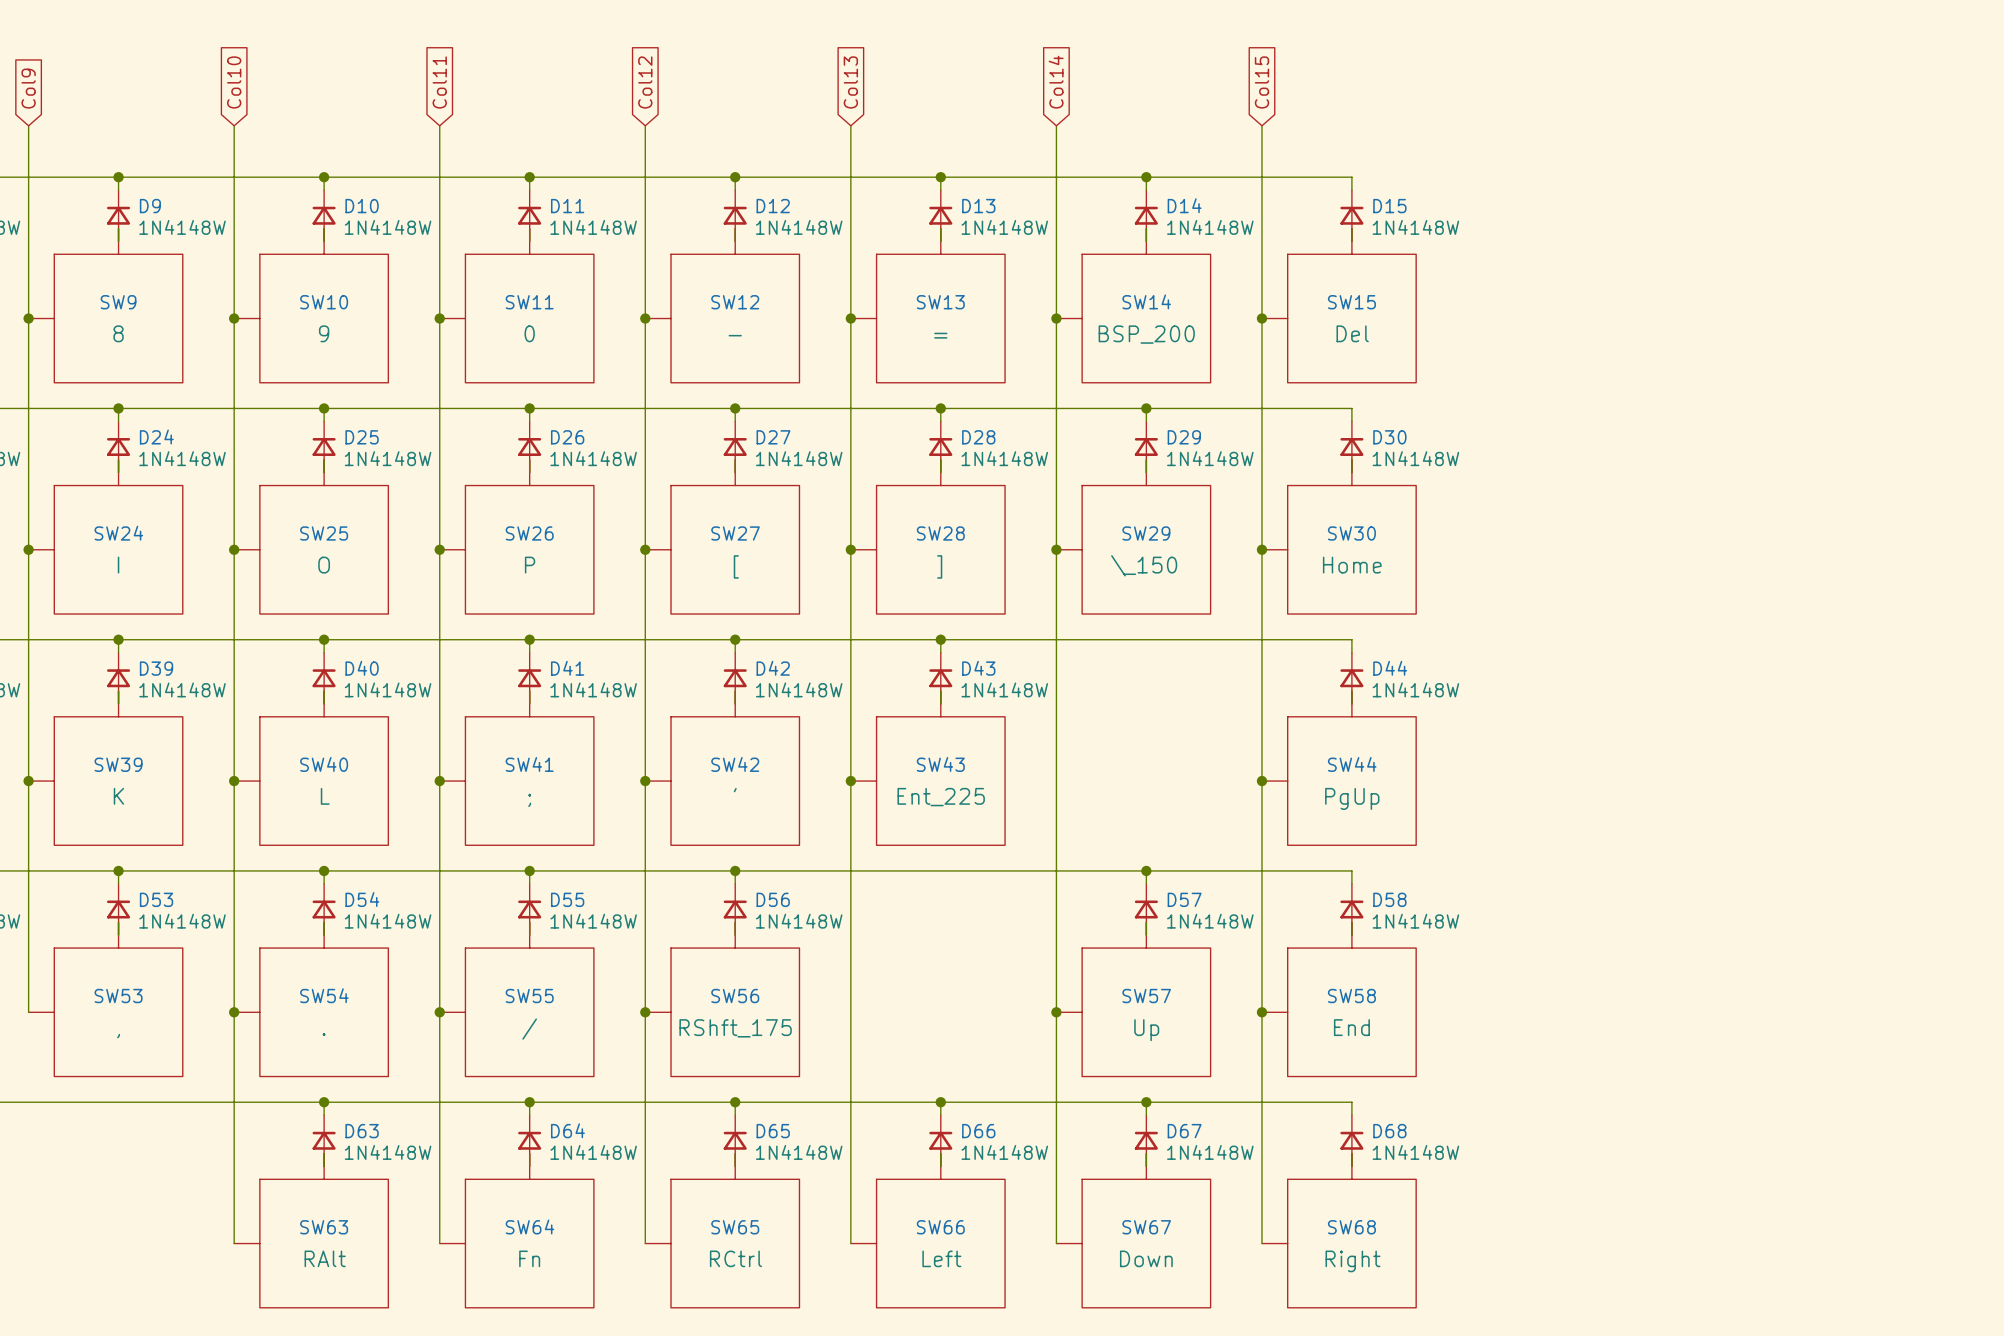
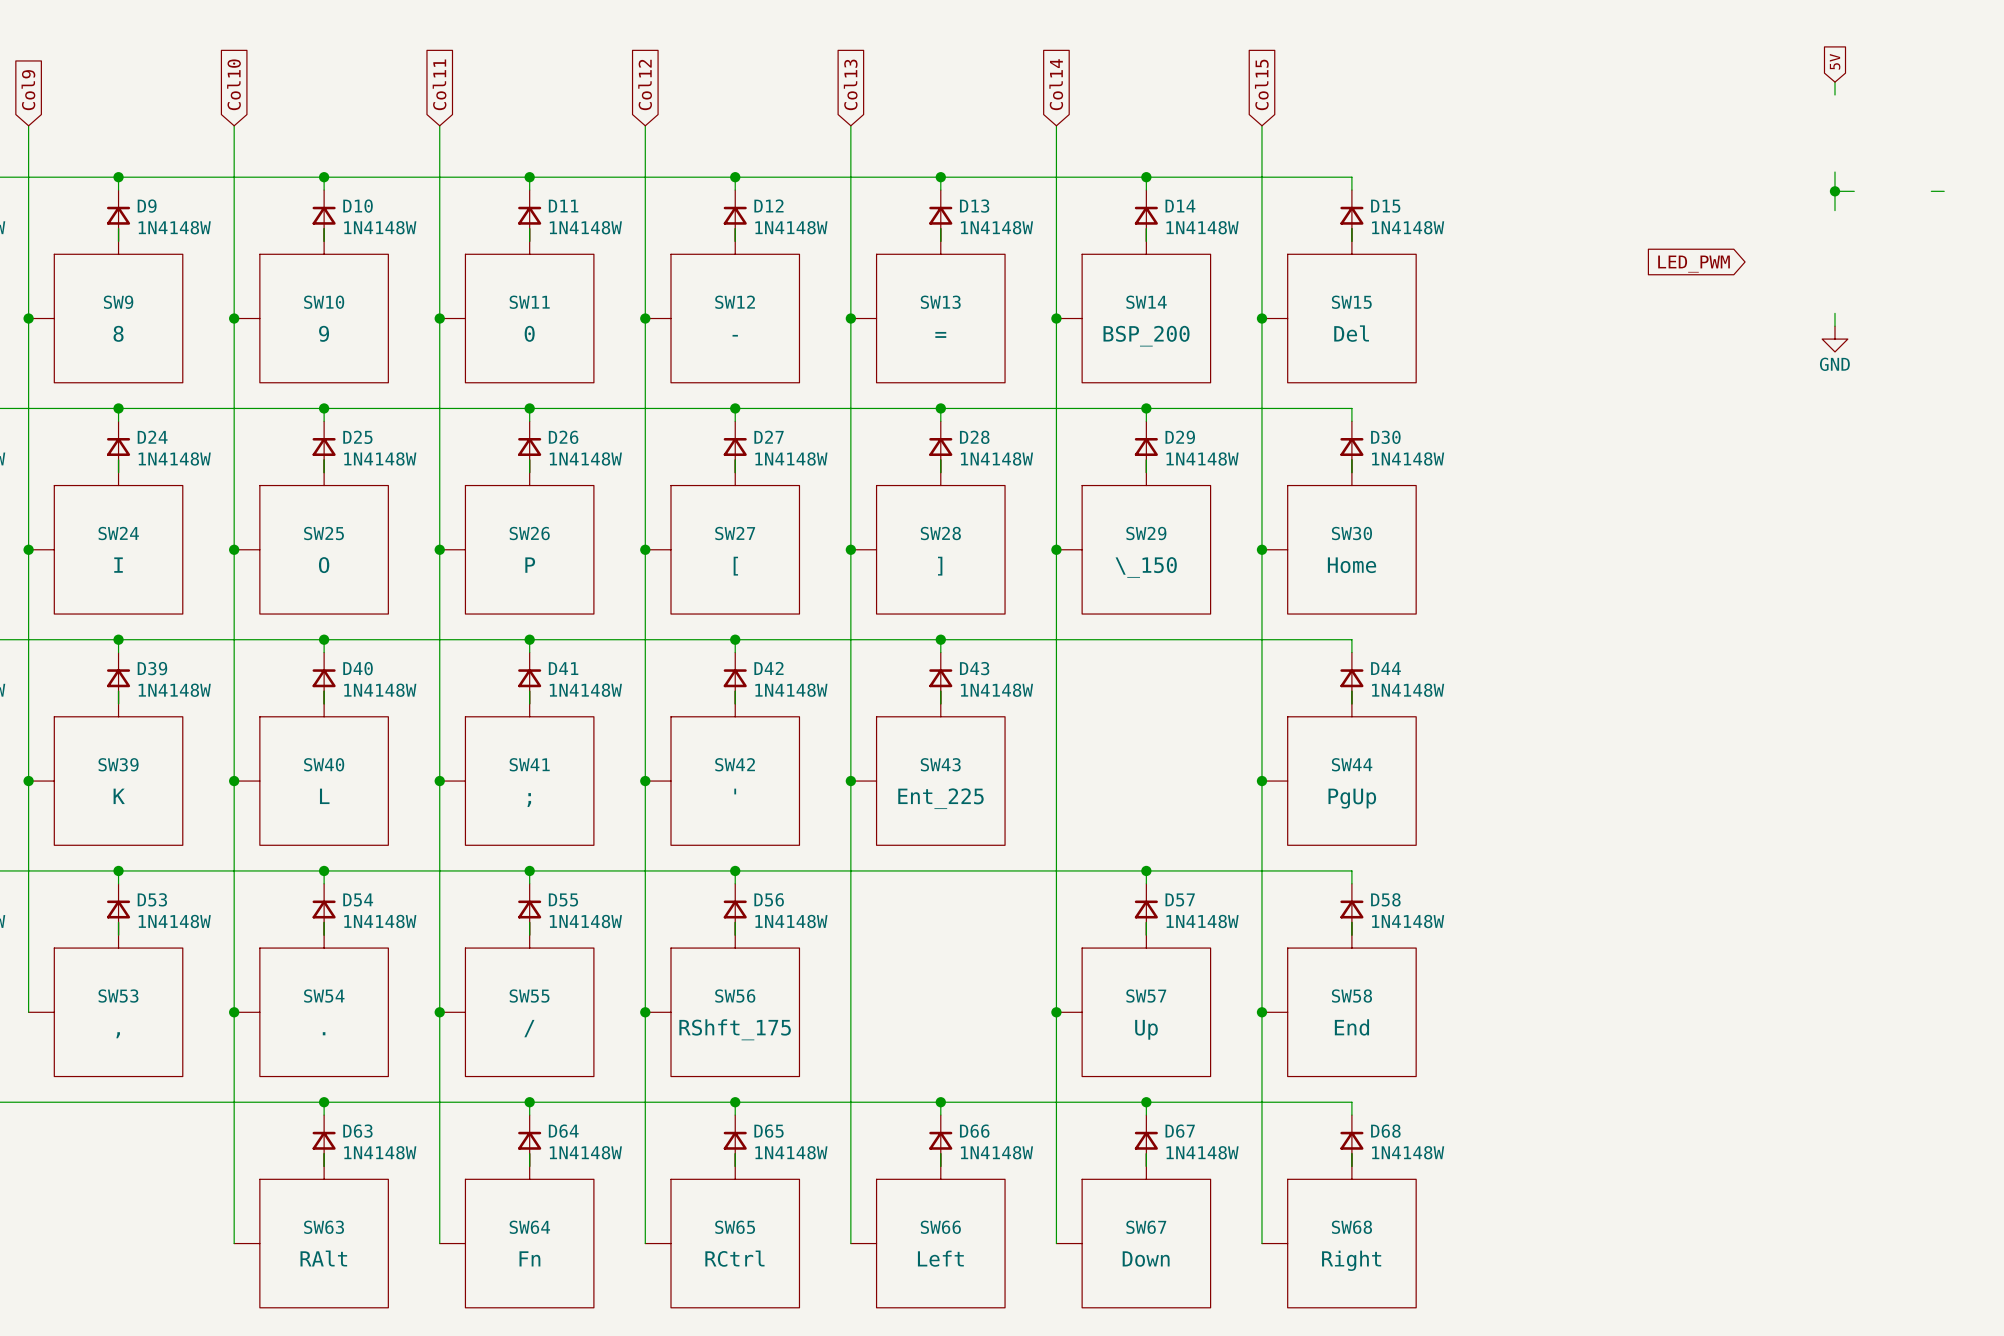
global label: none -> 5V (1835, 61)
wire: none -> (1834, 82) (1834, 94)
wire: none -> (1834, 172) (1834, 210)
wire: none -> (1834, 191) (1854, 191)
junction: none -> (1834, 191)
wire: none -> (1931, 191) (1944, 191)
global label: none -> LED_PWM (1694, 264)
wire: none -> (1834, 313) (1834, 326)
power symbol: none -> GND (1834, 339)

